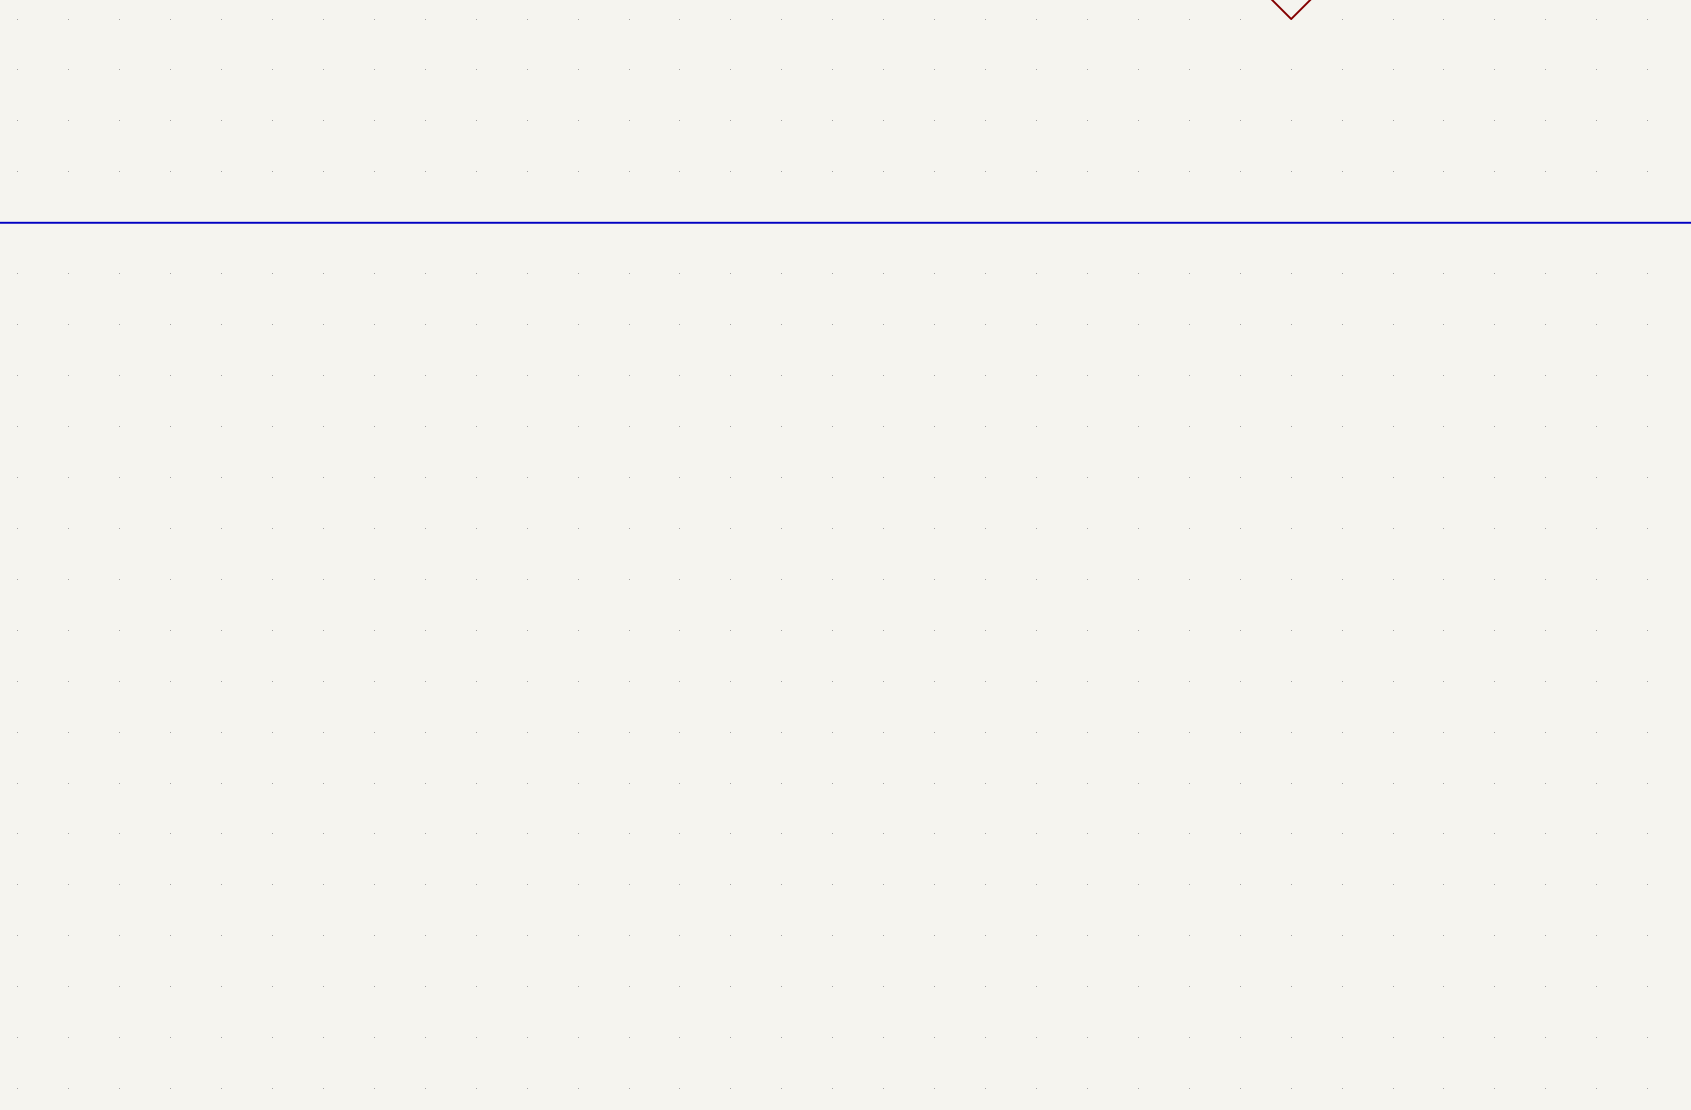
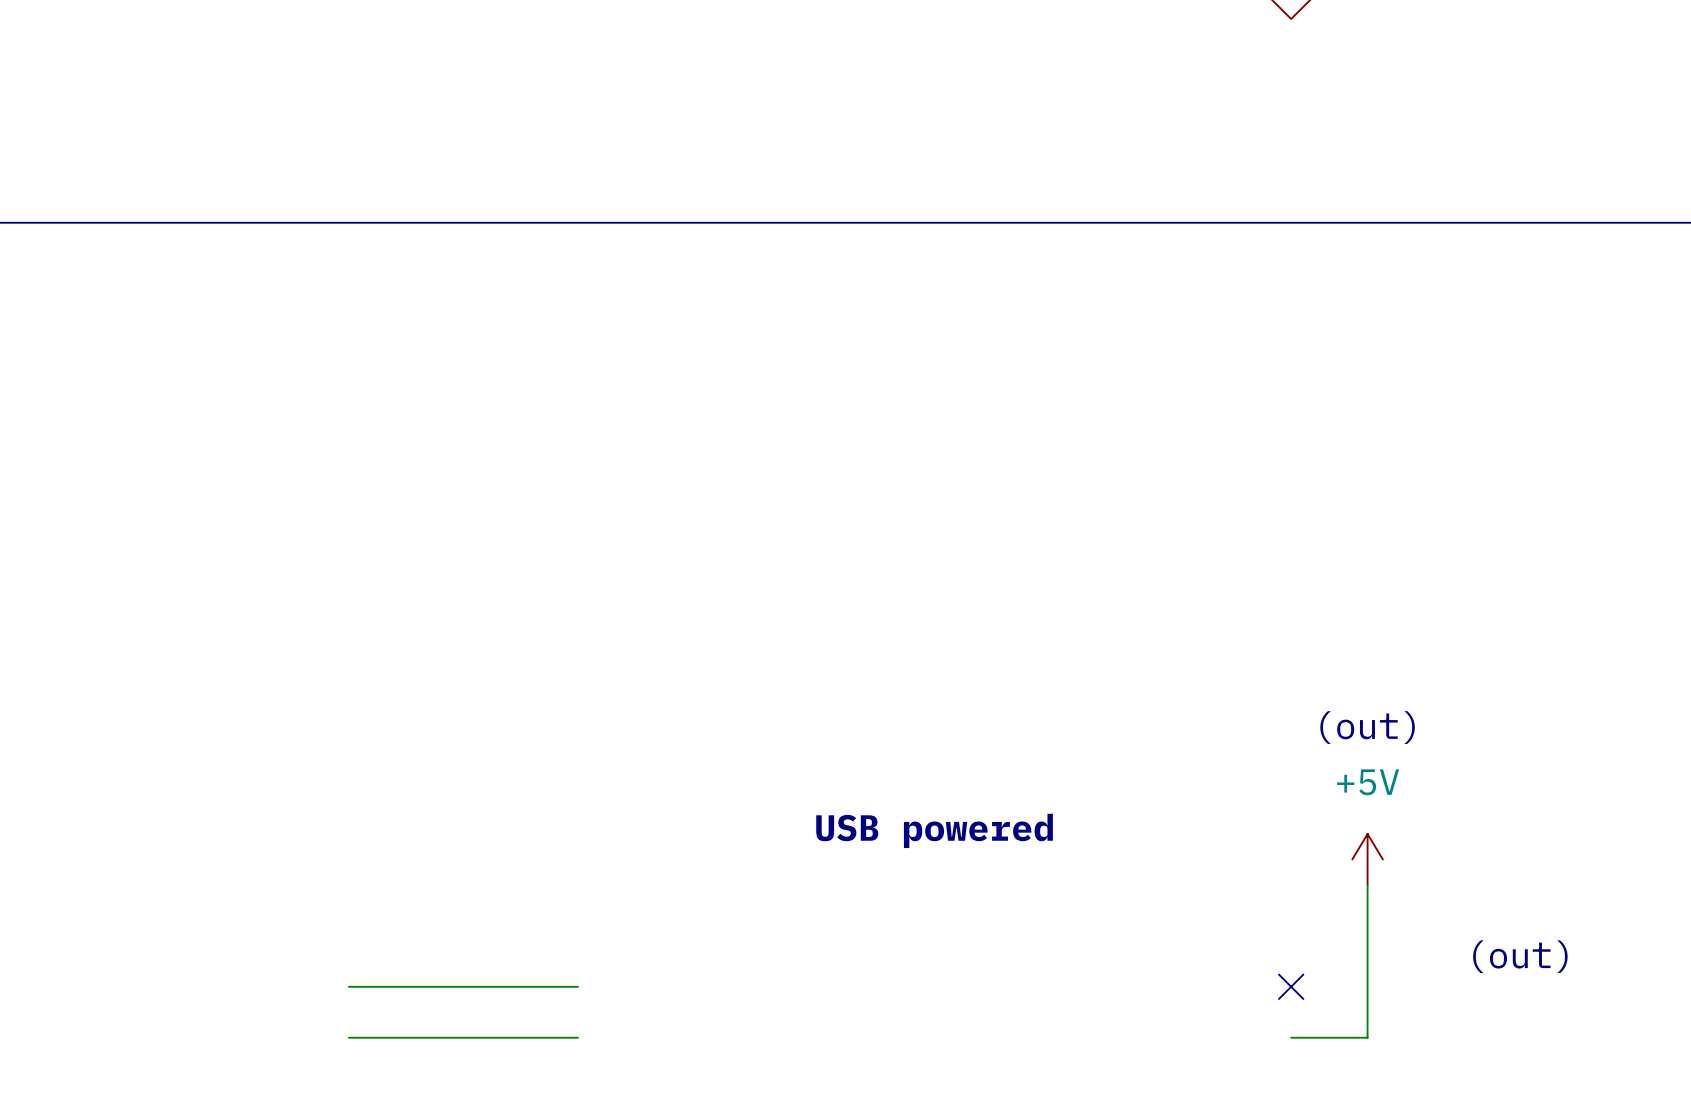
text: none -> (out) (1367, 727)
text: none -> USB powered (934, 830)
power symbol: none -> +5V (1367, 859)
wire: none -> (1367, 884) (1367, 1037) (1291, 1037)
text: none -> (out) (1520, 956)
wire: none -> (348, 986) (578, 986)
no-connect mark: none -> (1291, 986)
wire: none -> (348, 1037) (578, 1037)

